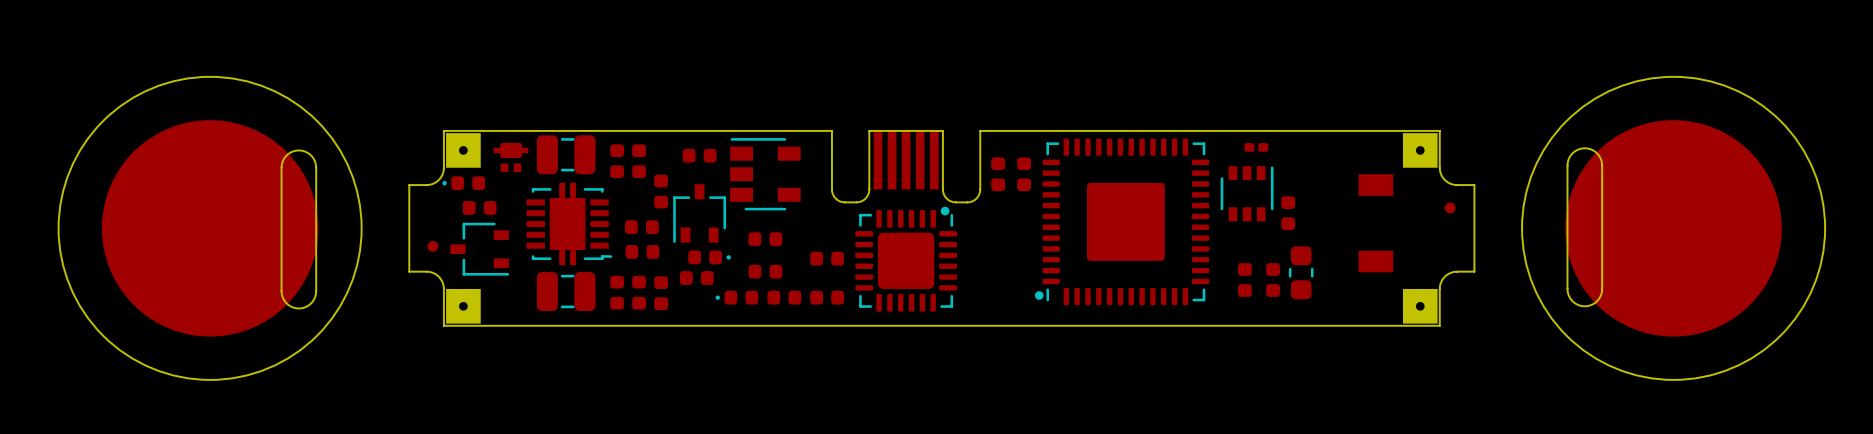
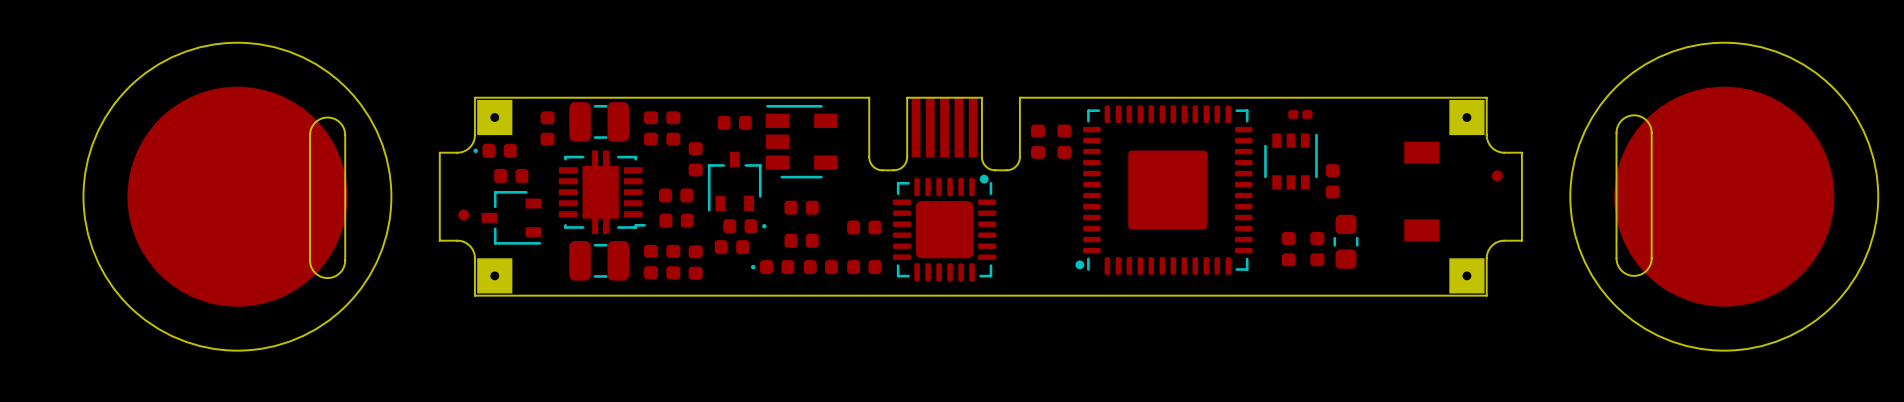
part footprint: [493, 142, 529, 173] -> [540, 111, 555, 146]

